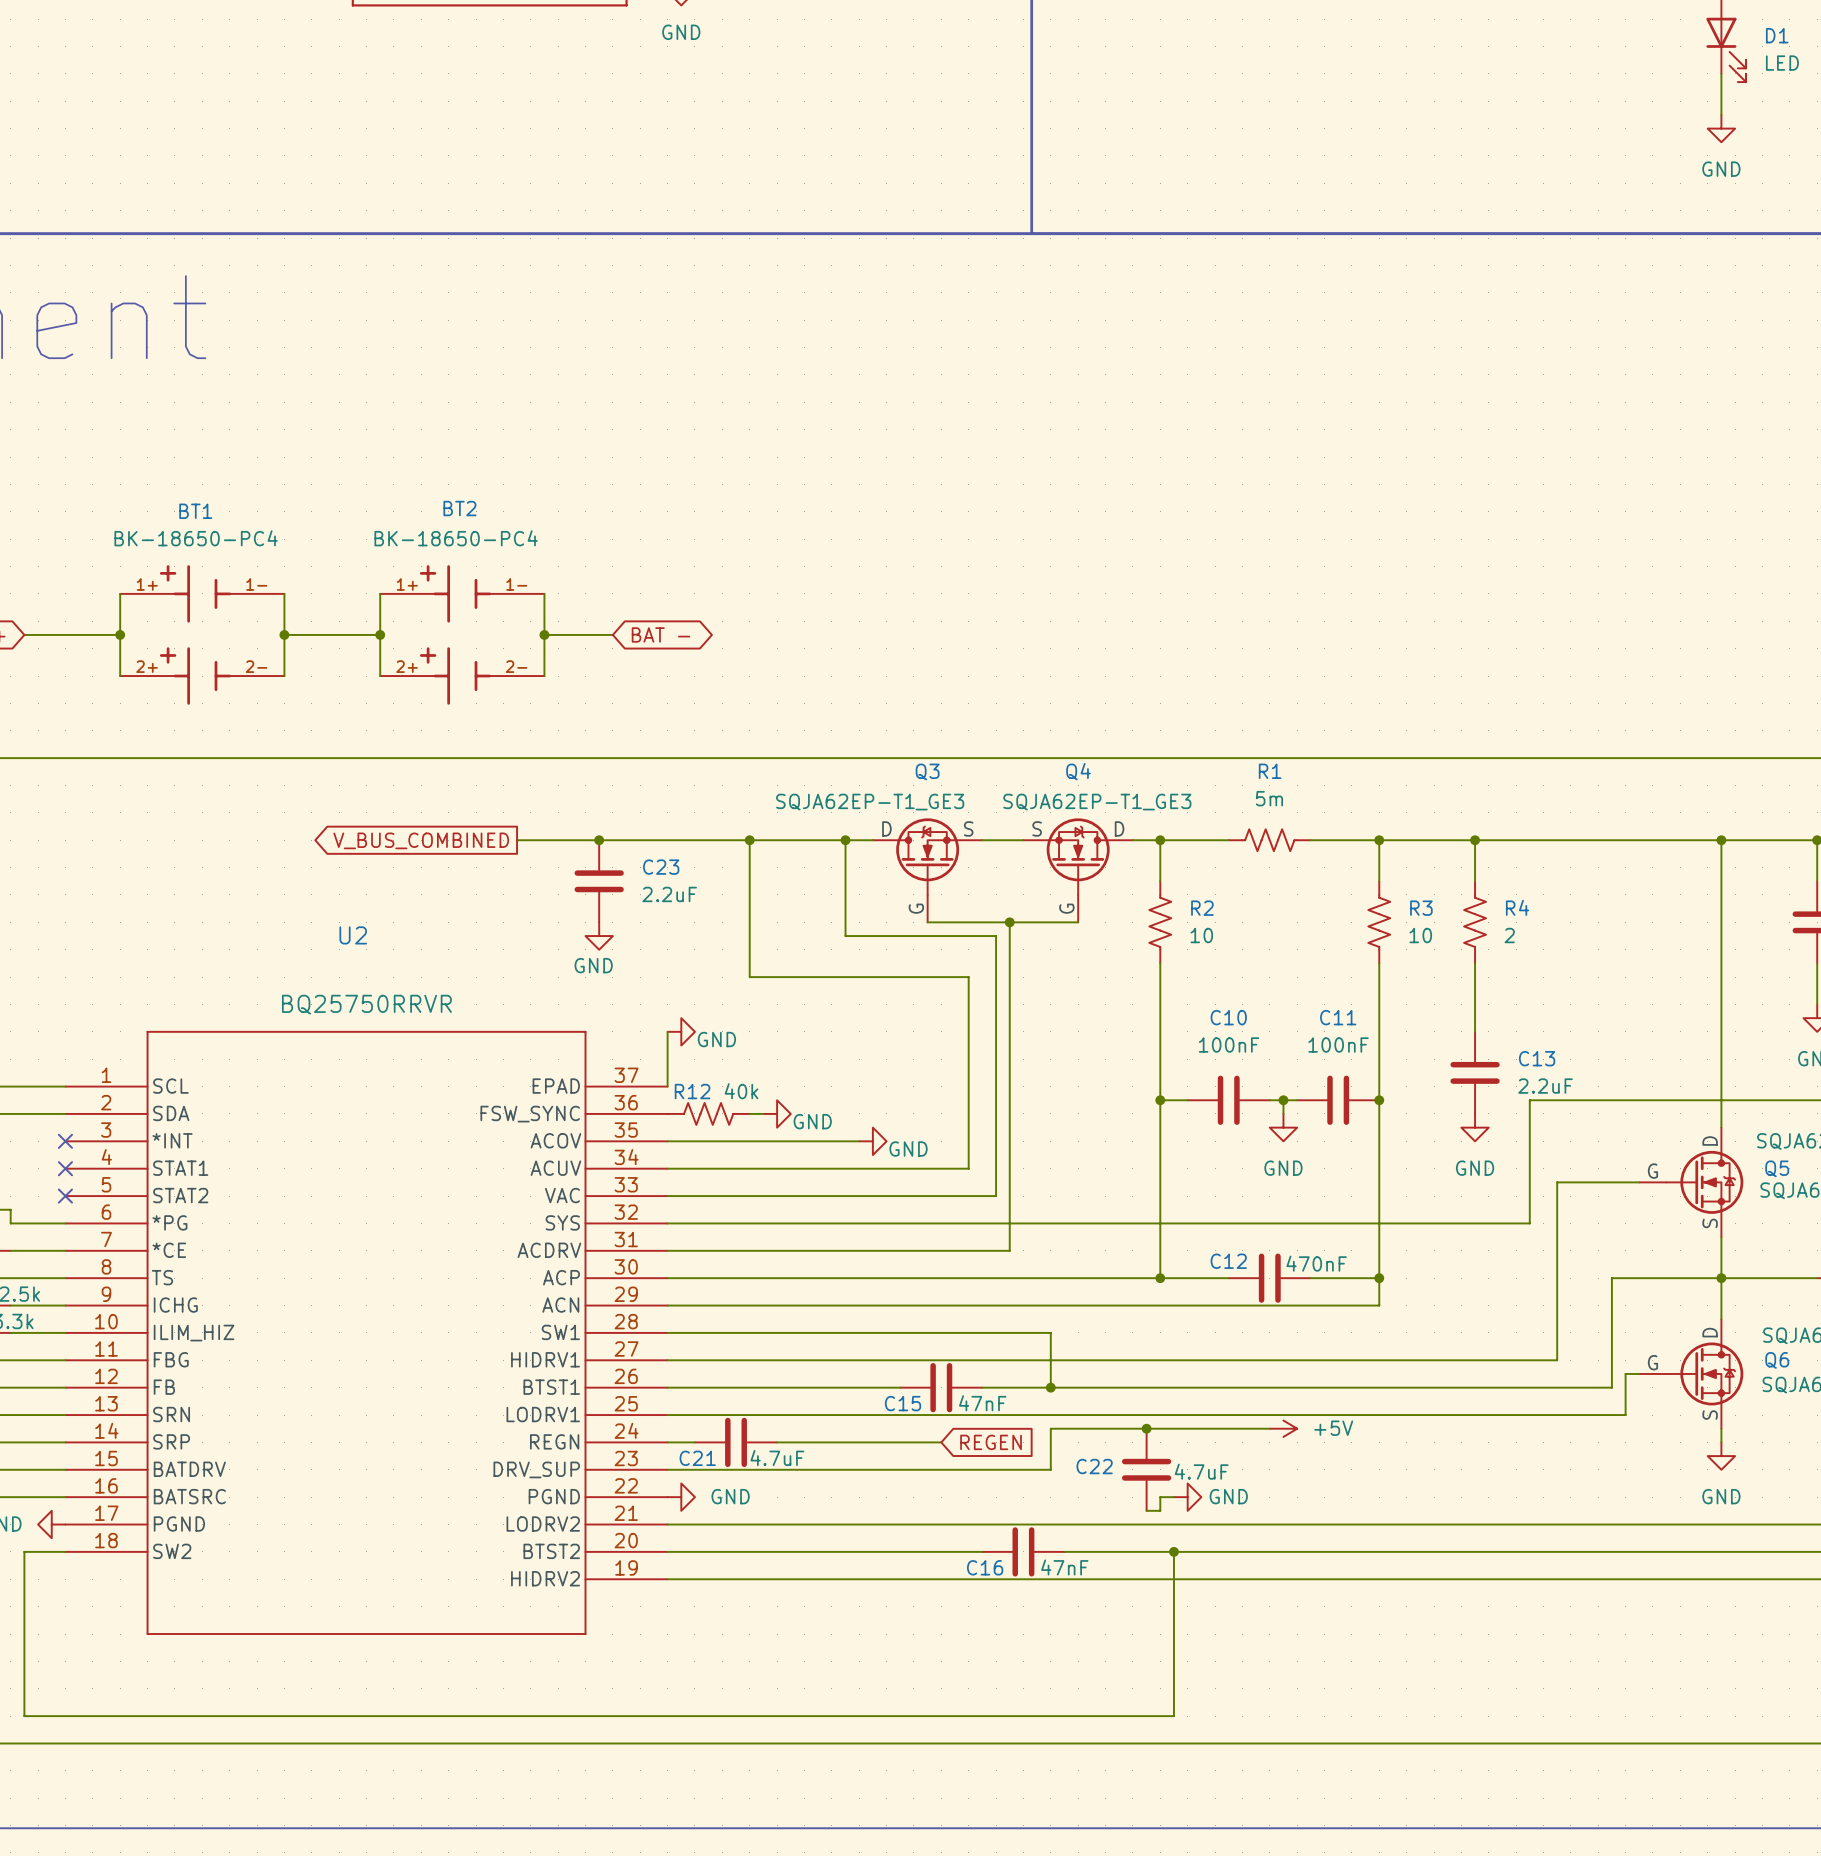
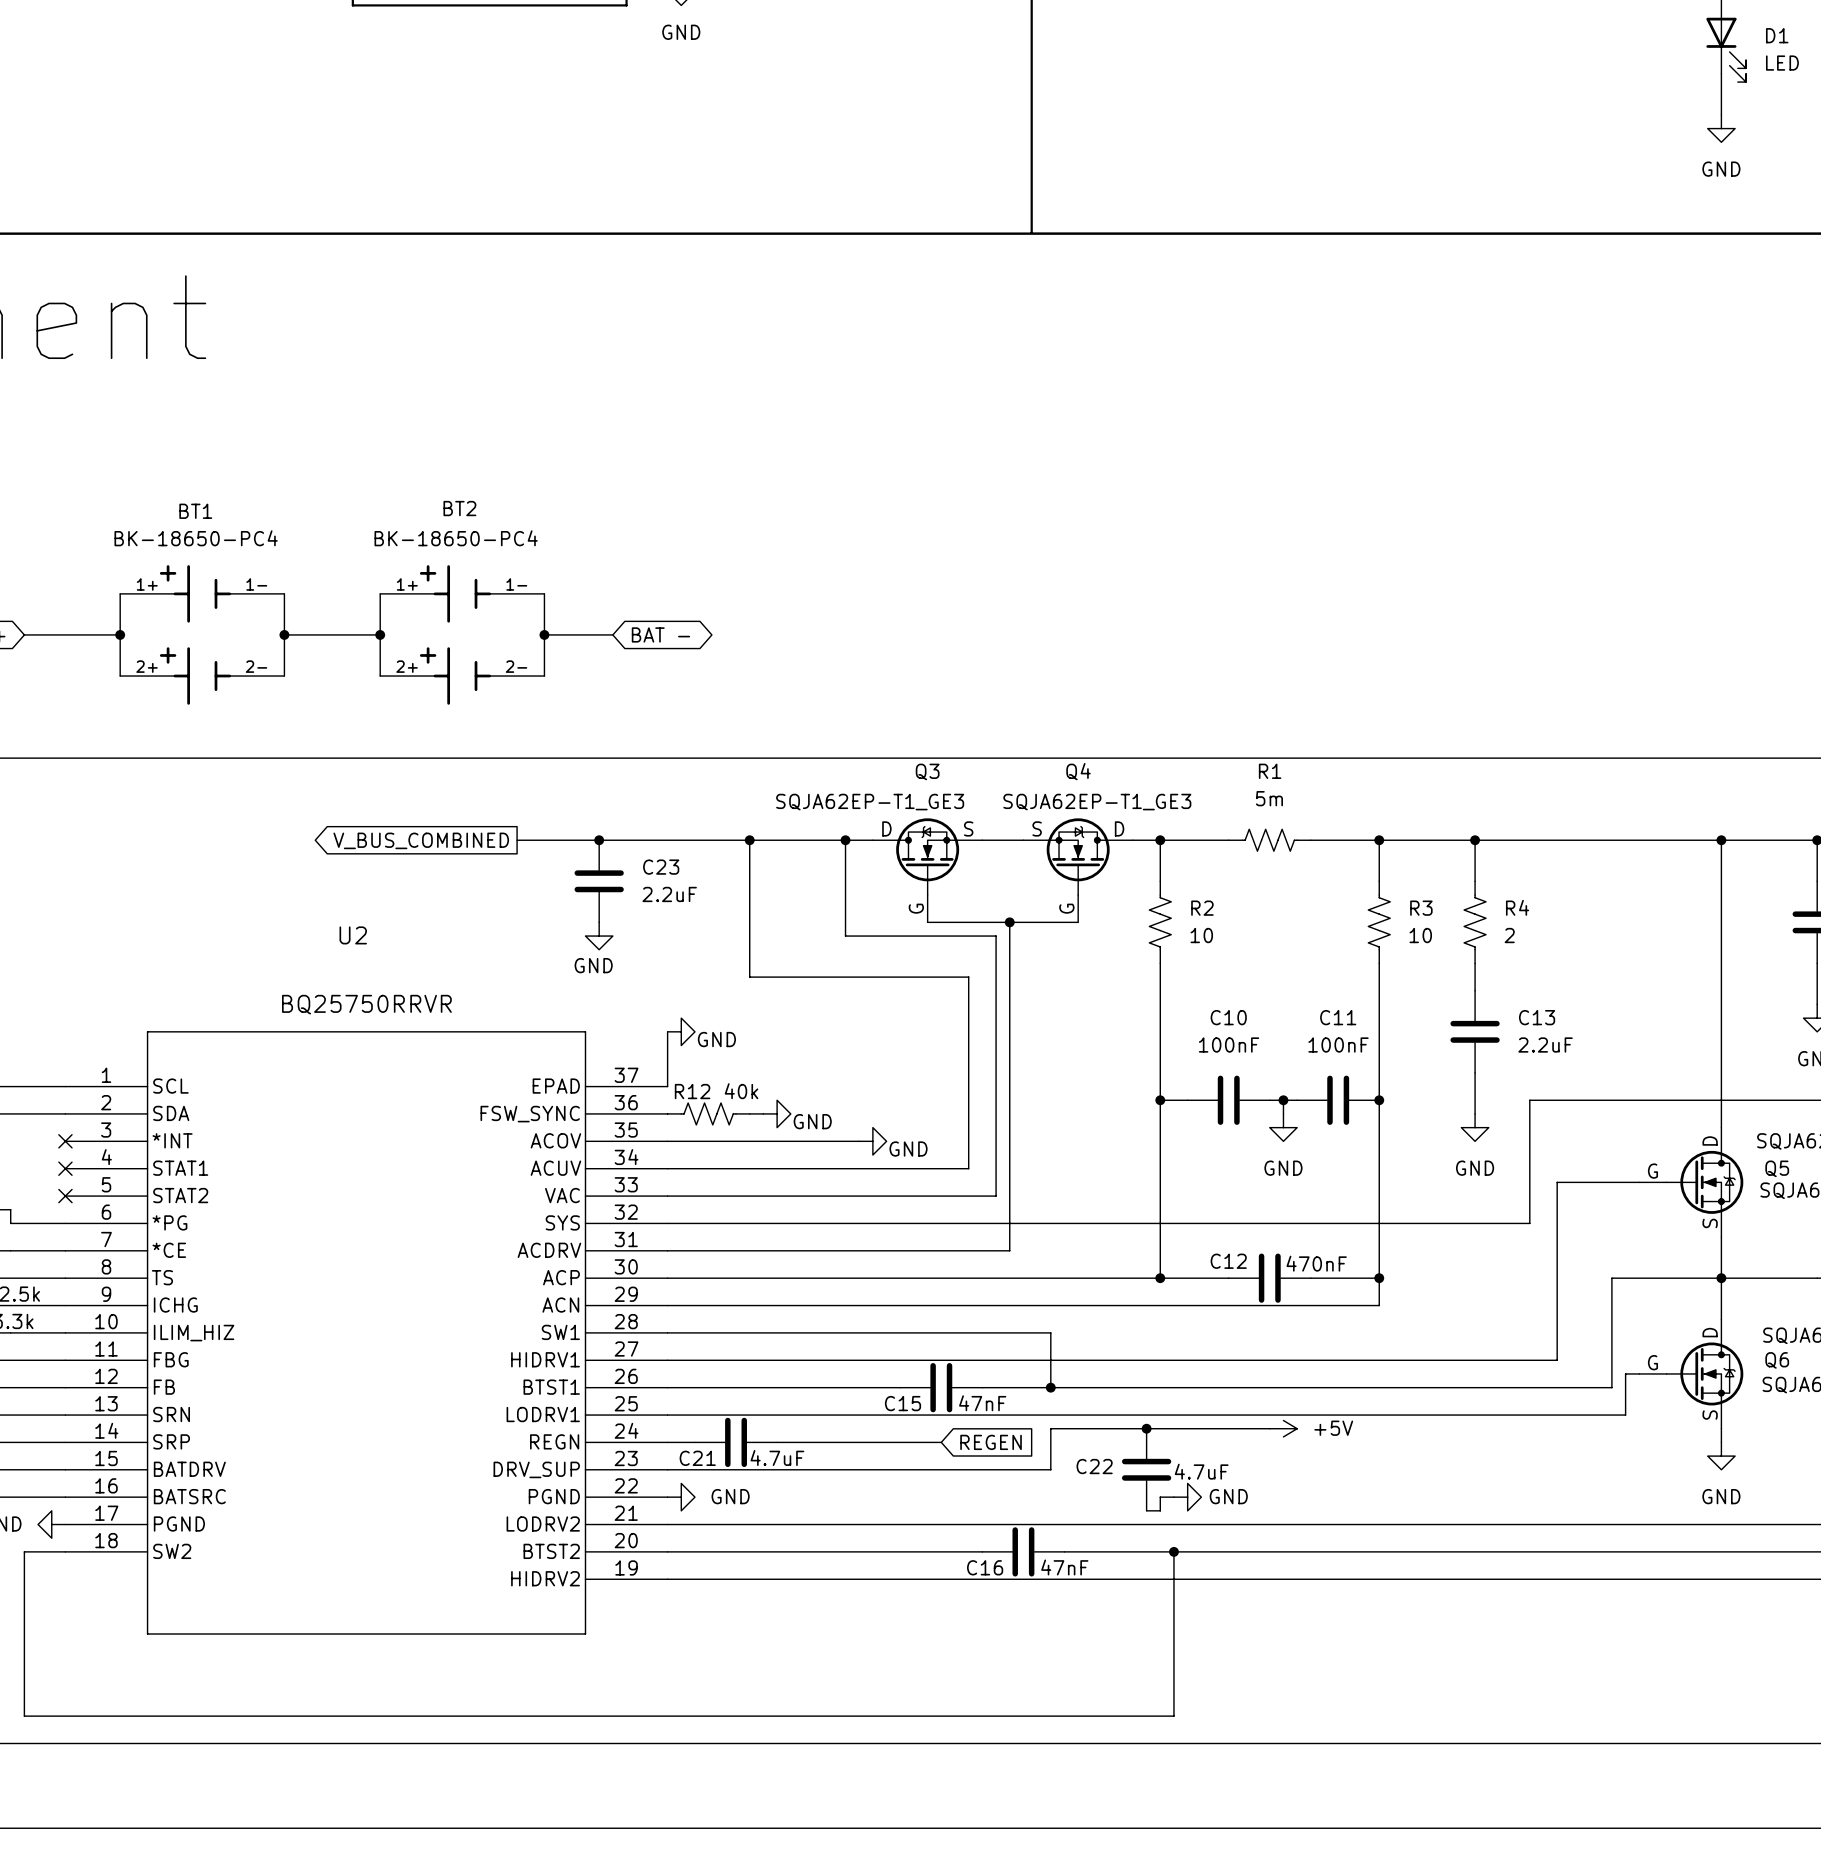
C13 position: (1475, 1072) -> (1475, 1031)

